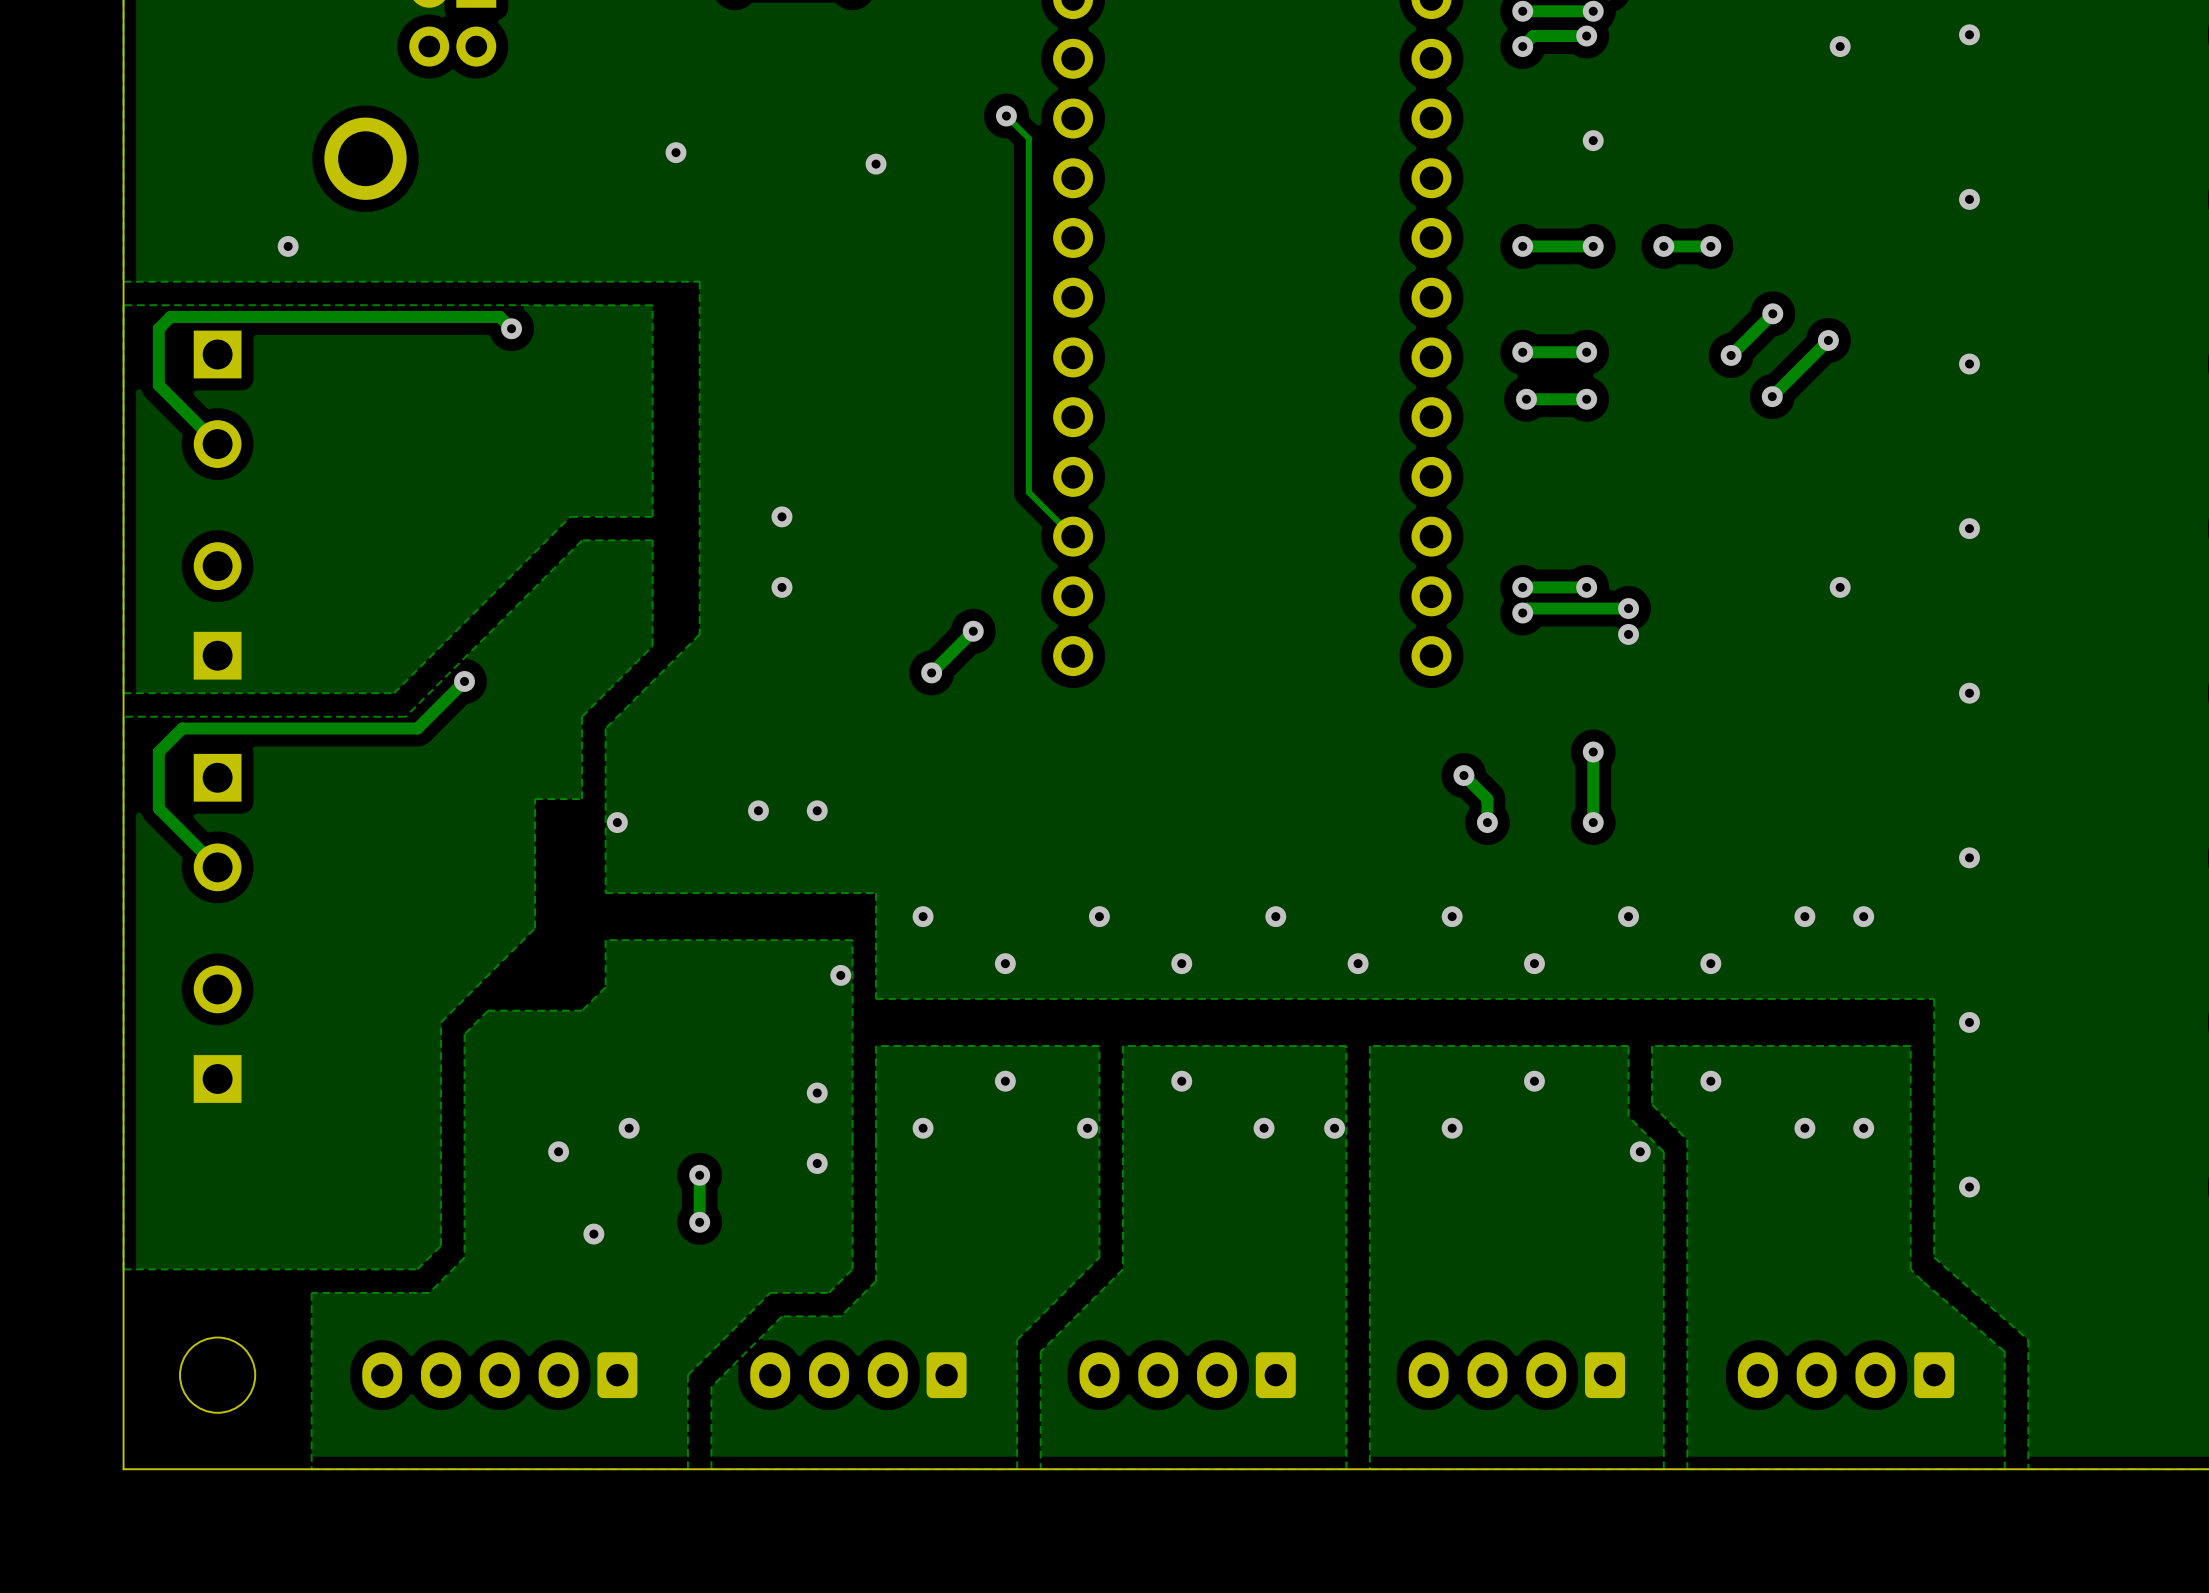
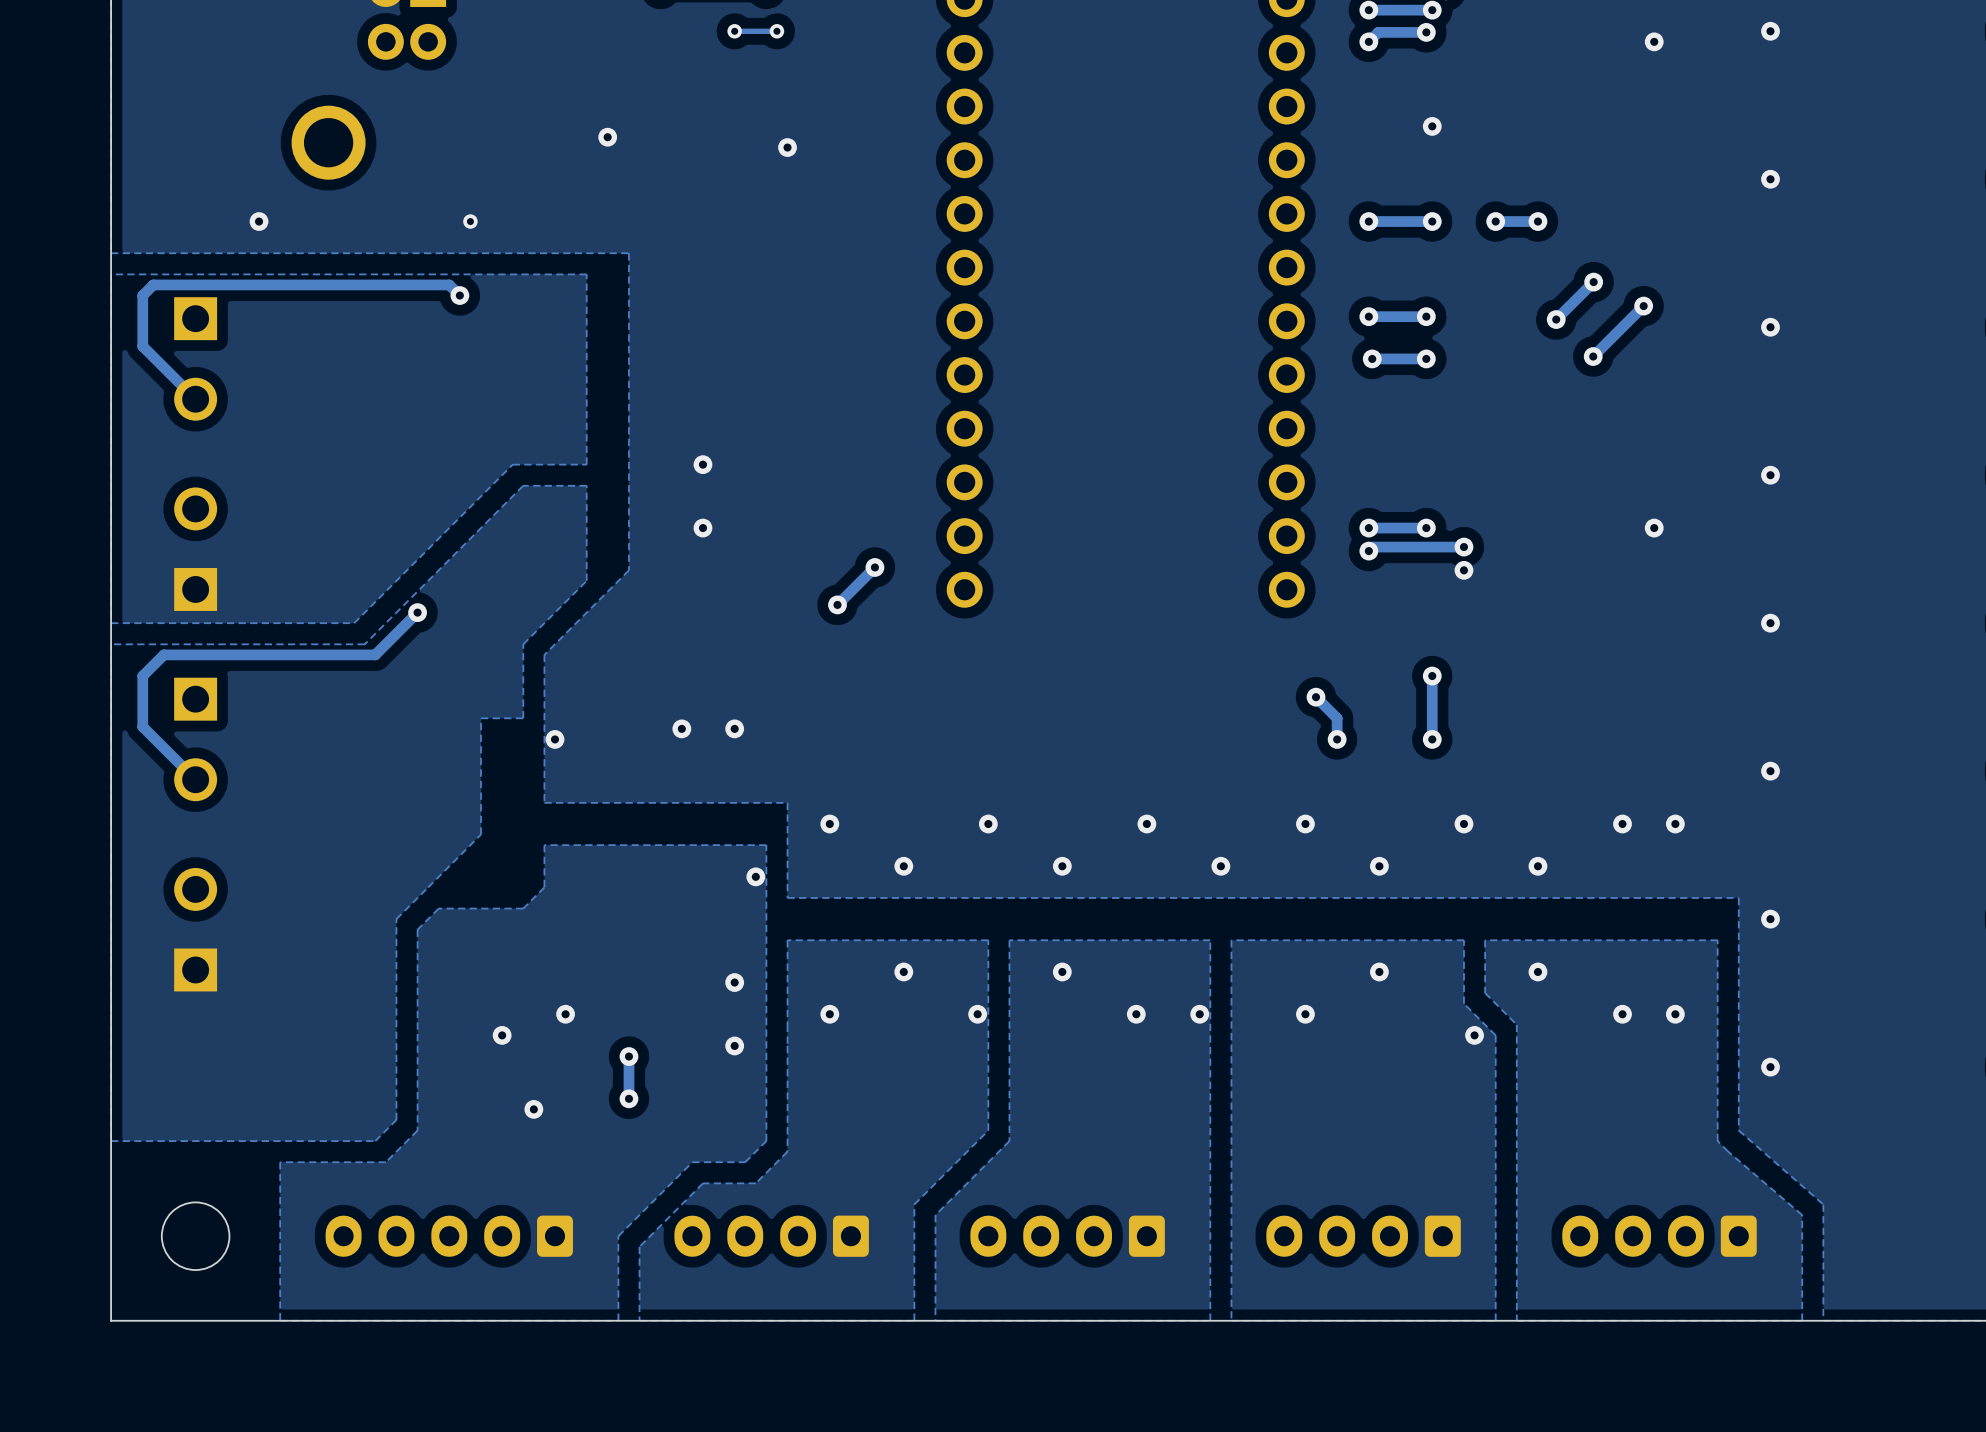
via: none -> (734, 31)
track: none -> (776, 31) (734, 31)
via: none -> (776, 31)
track: (1006, 116) (1028, 138) (1028, 492) (1073, 536) -> none
via: (1006, 116) -> none
via: none -> (470, 221)

